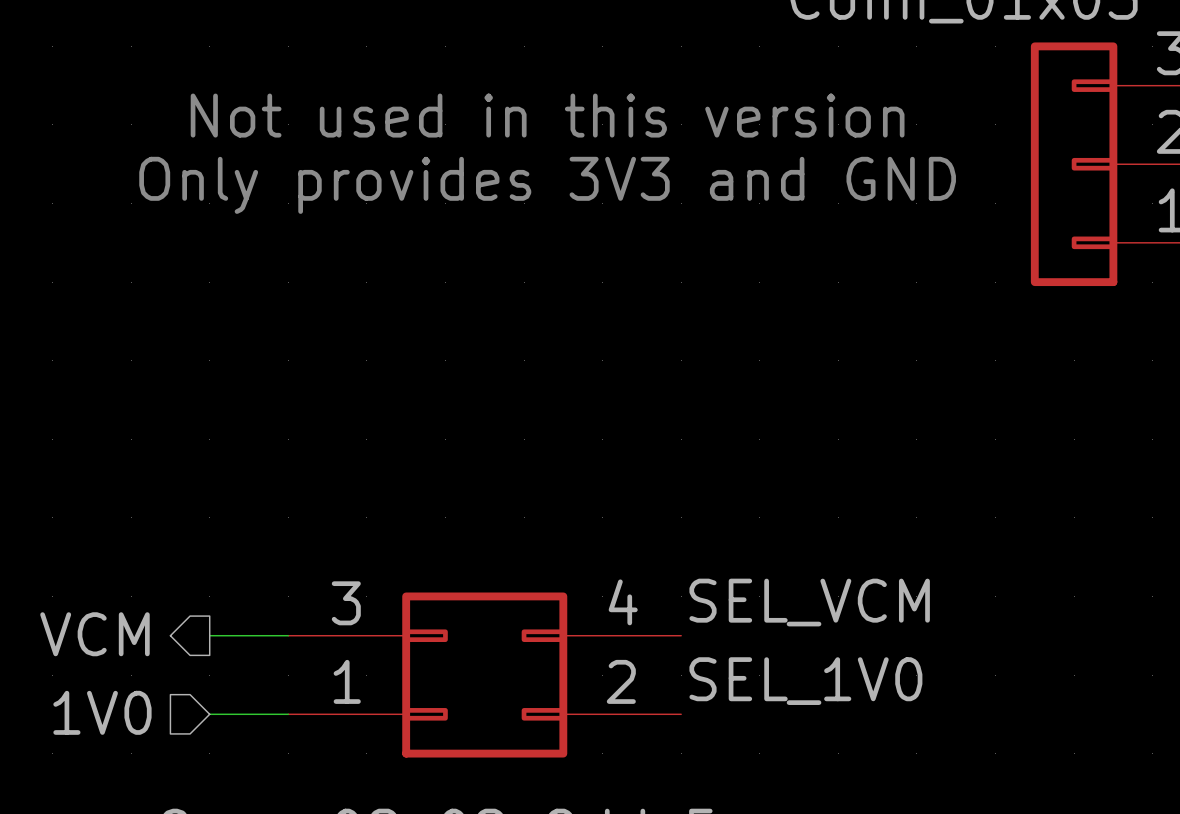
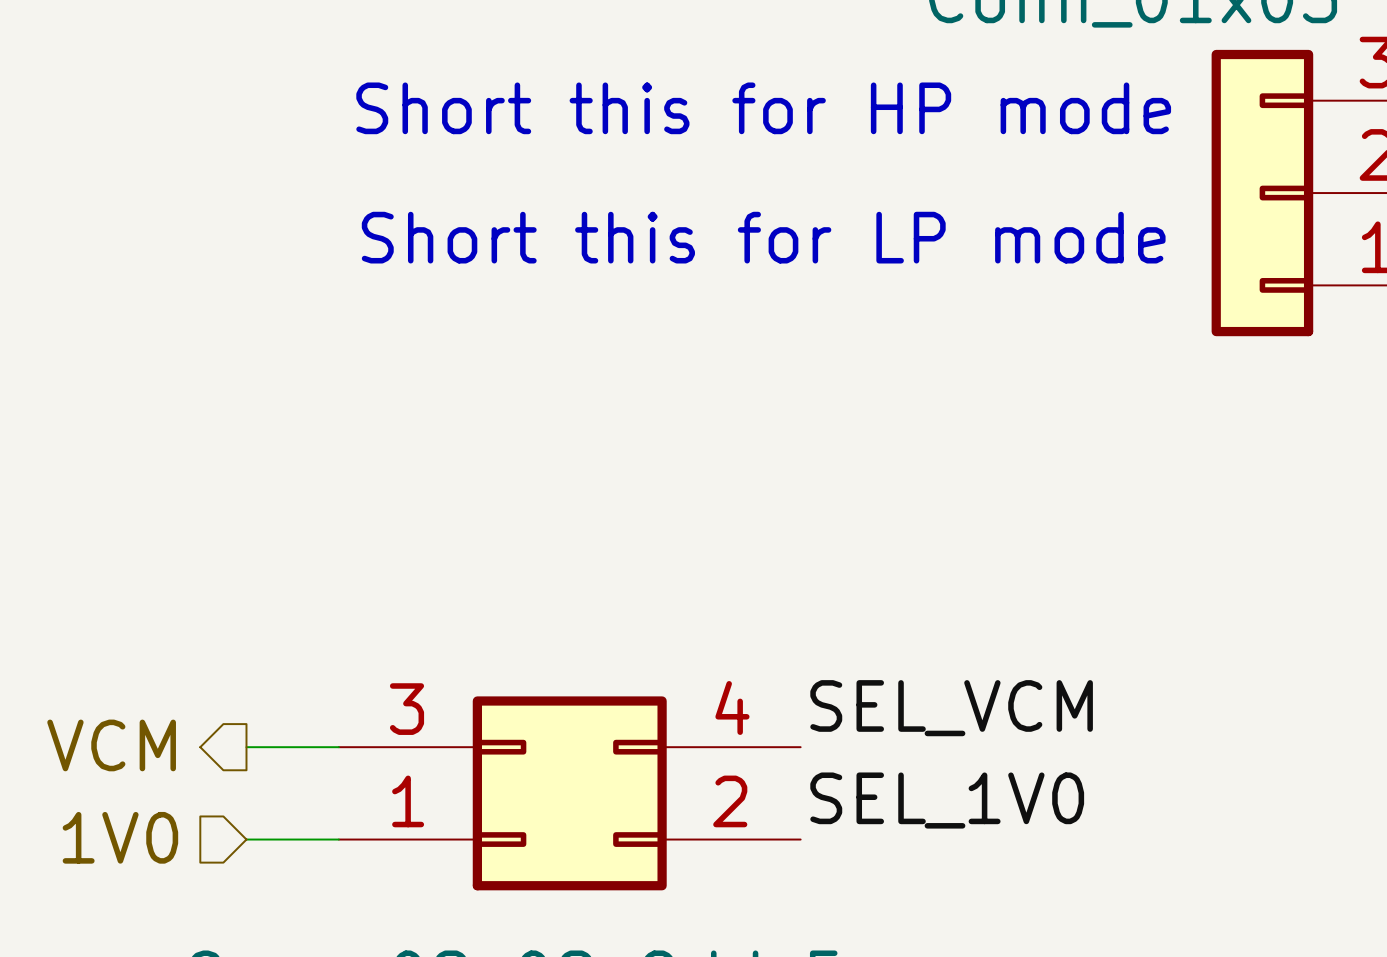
text: none -> Short this for HP mode (763, 108)
text: Not used in this version (547, 115) -> none
text: Only provides 3V3 and GND (547, 185) -> none
text: none -> Short this for LP mode (763, 237)

